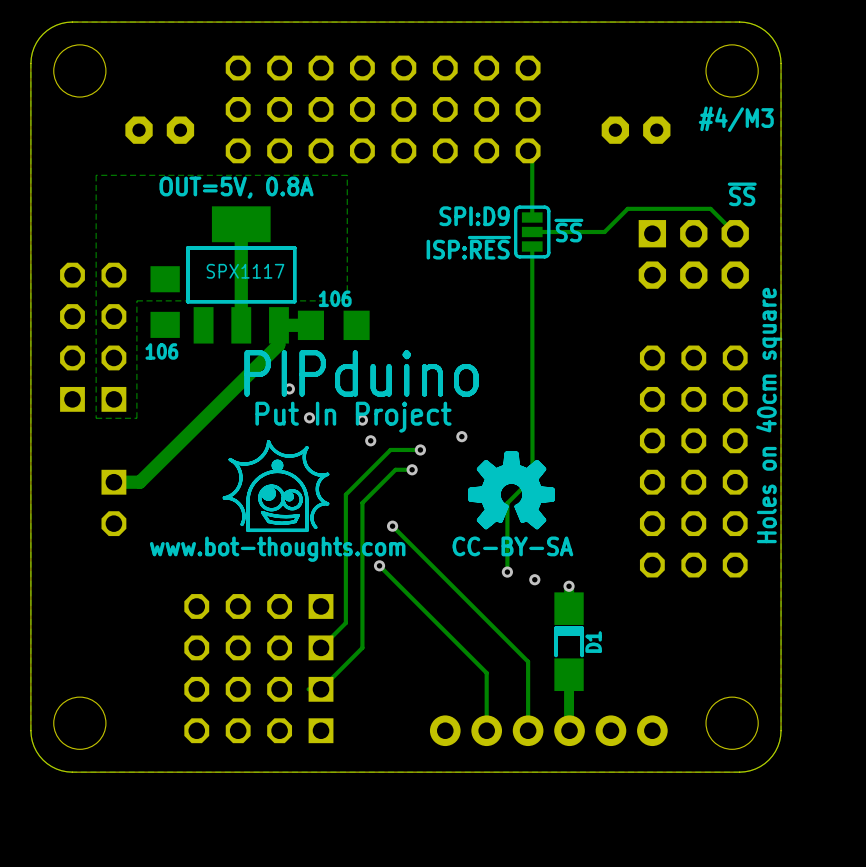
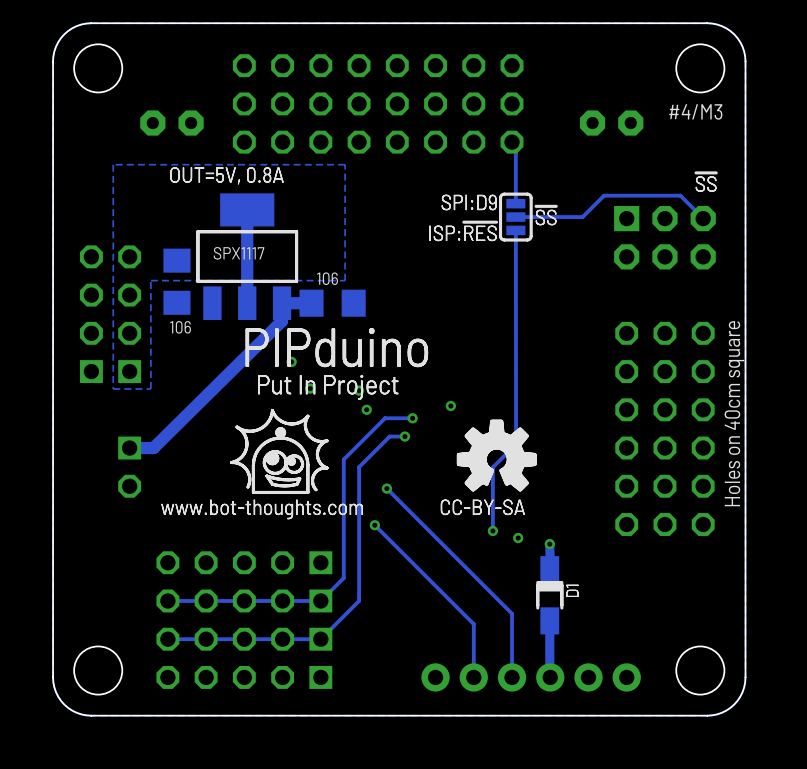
part footprint: [554, 592, 584, 692] -> [536, 556, 564, 635]
part: none -> (244, 562)
part: none -> (244, 600)
part: (258, 647) -> none
track: none -> (320, 600) (167, 600)
part: none -> (244, 639)
part: (258, 689) -> none
track: none -> (309, 639) (167, 639)
part: none -> (244, 677)

